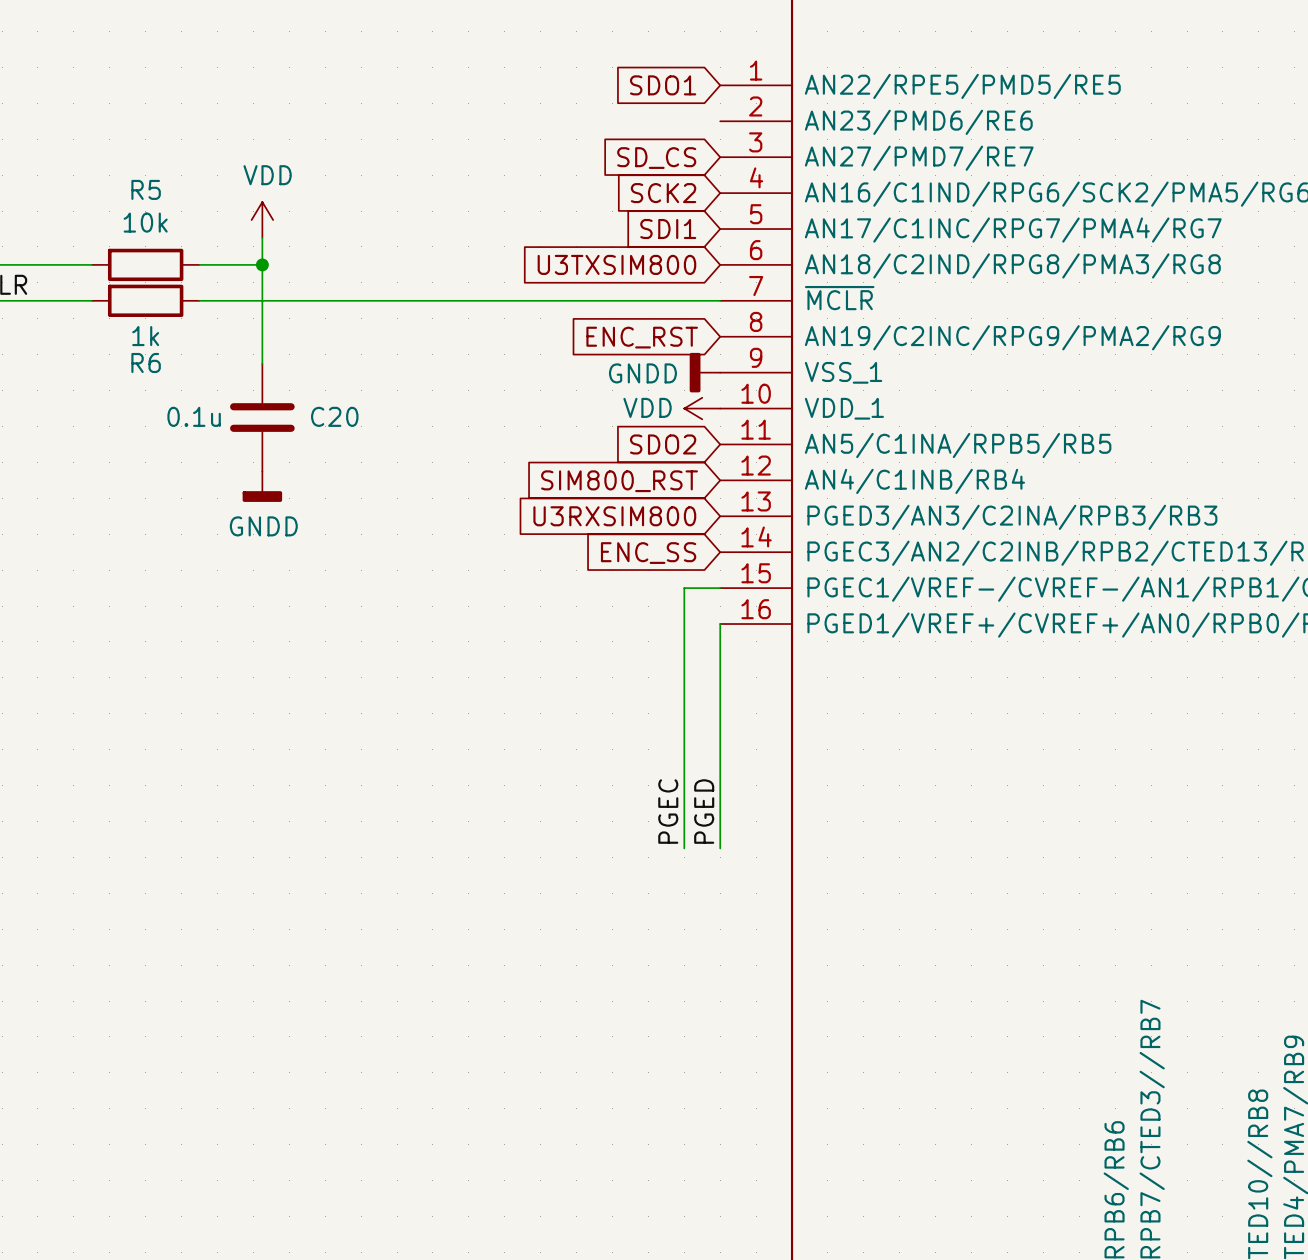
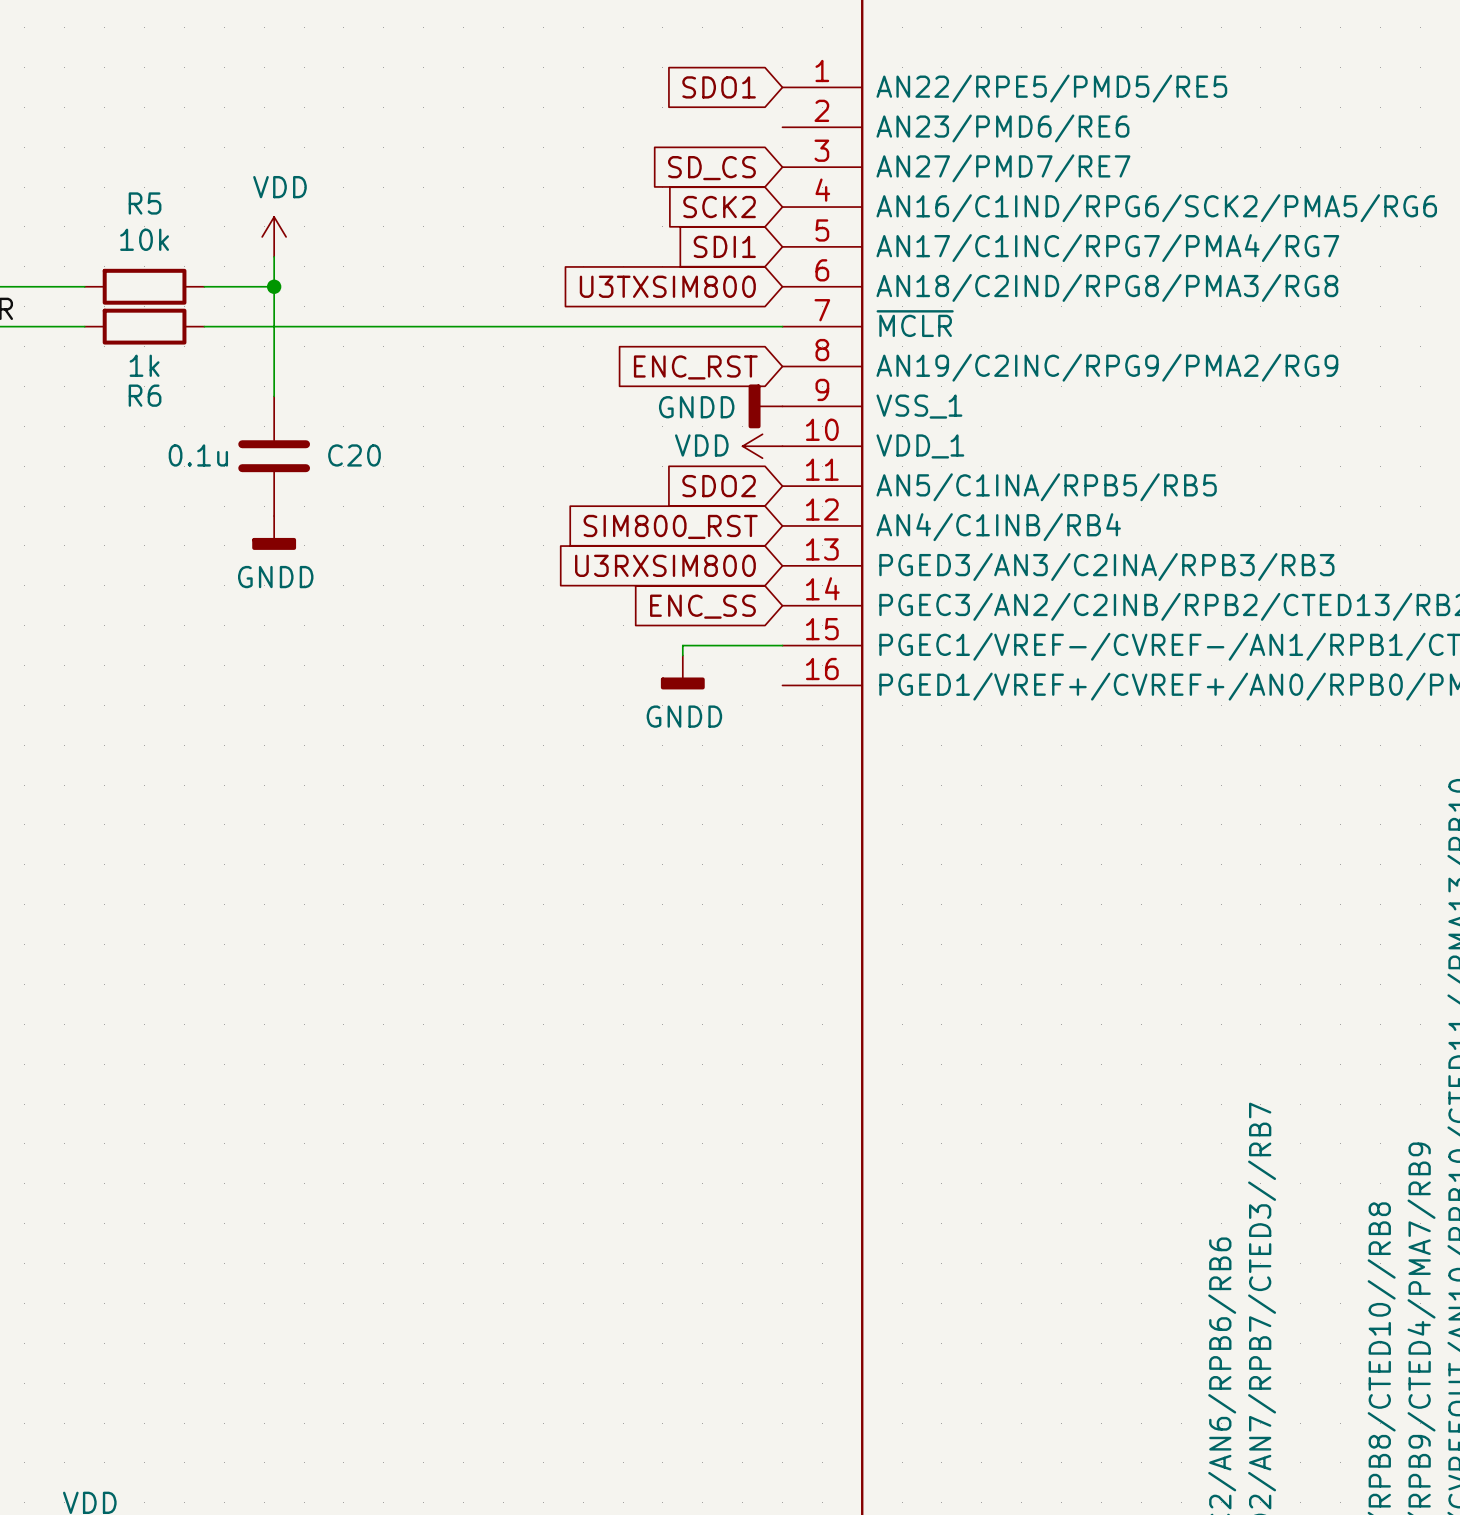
wire: (684, 588) (684, 848) -> (742, 645) (682, 645) (682, 655)
power symbol: none -> GNDD (682, 672)
wire: (720, 624) (720, 848) -> none
label: PGEC (668, 811) -> none
label: PGED (704, 811) -> none

